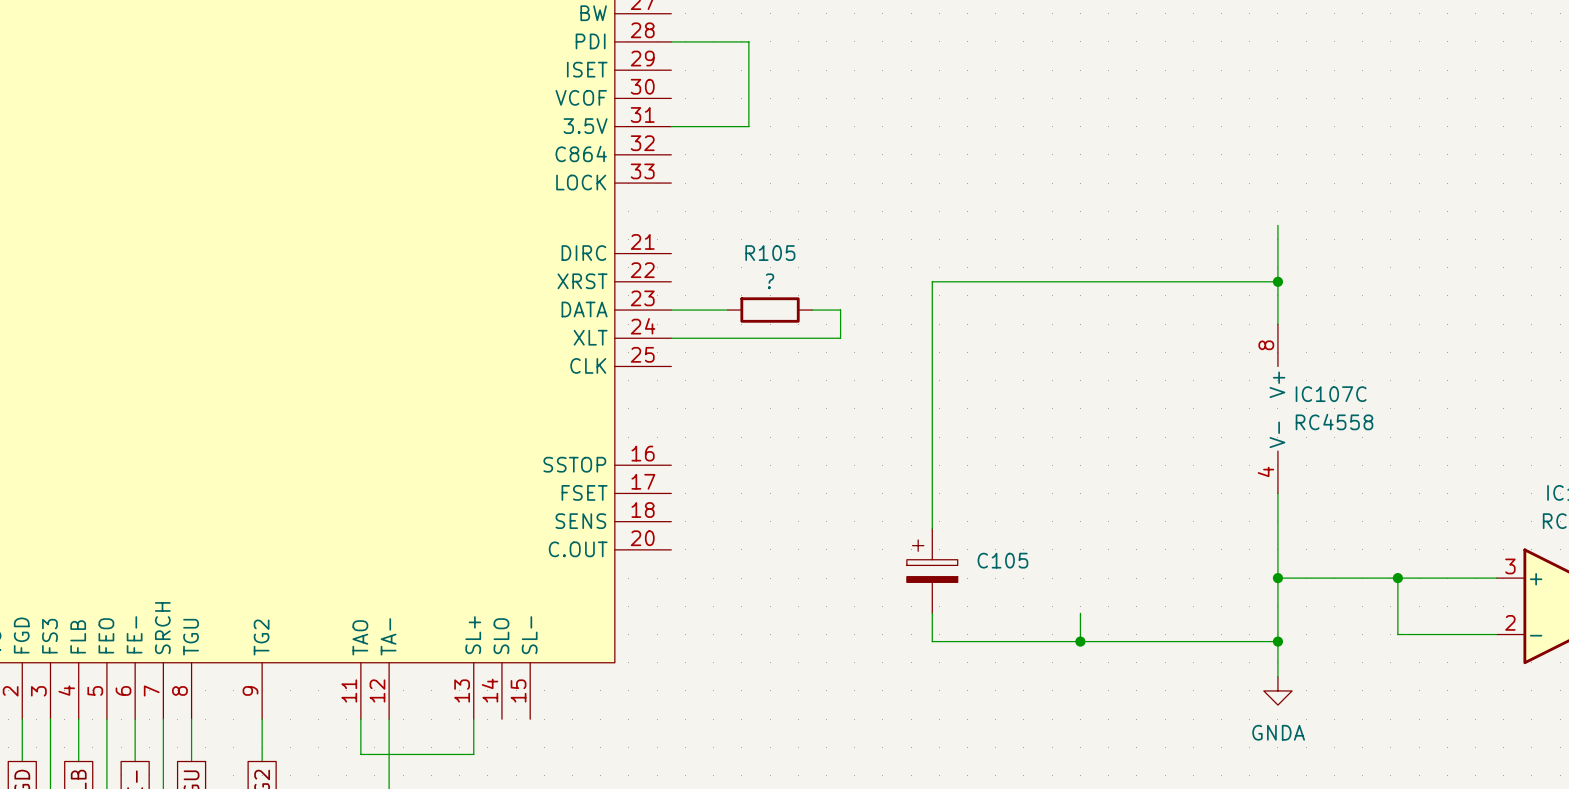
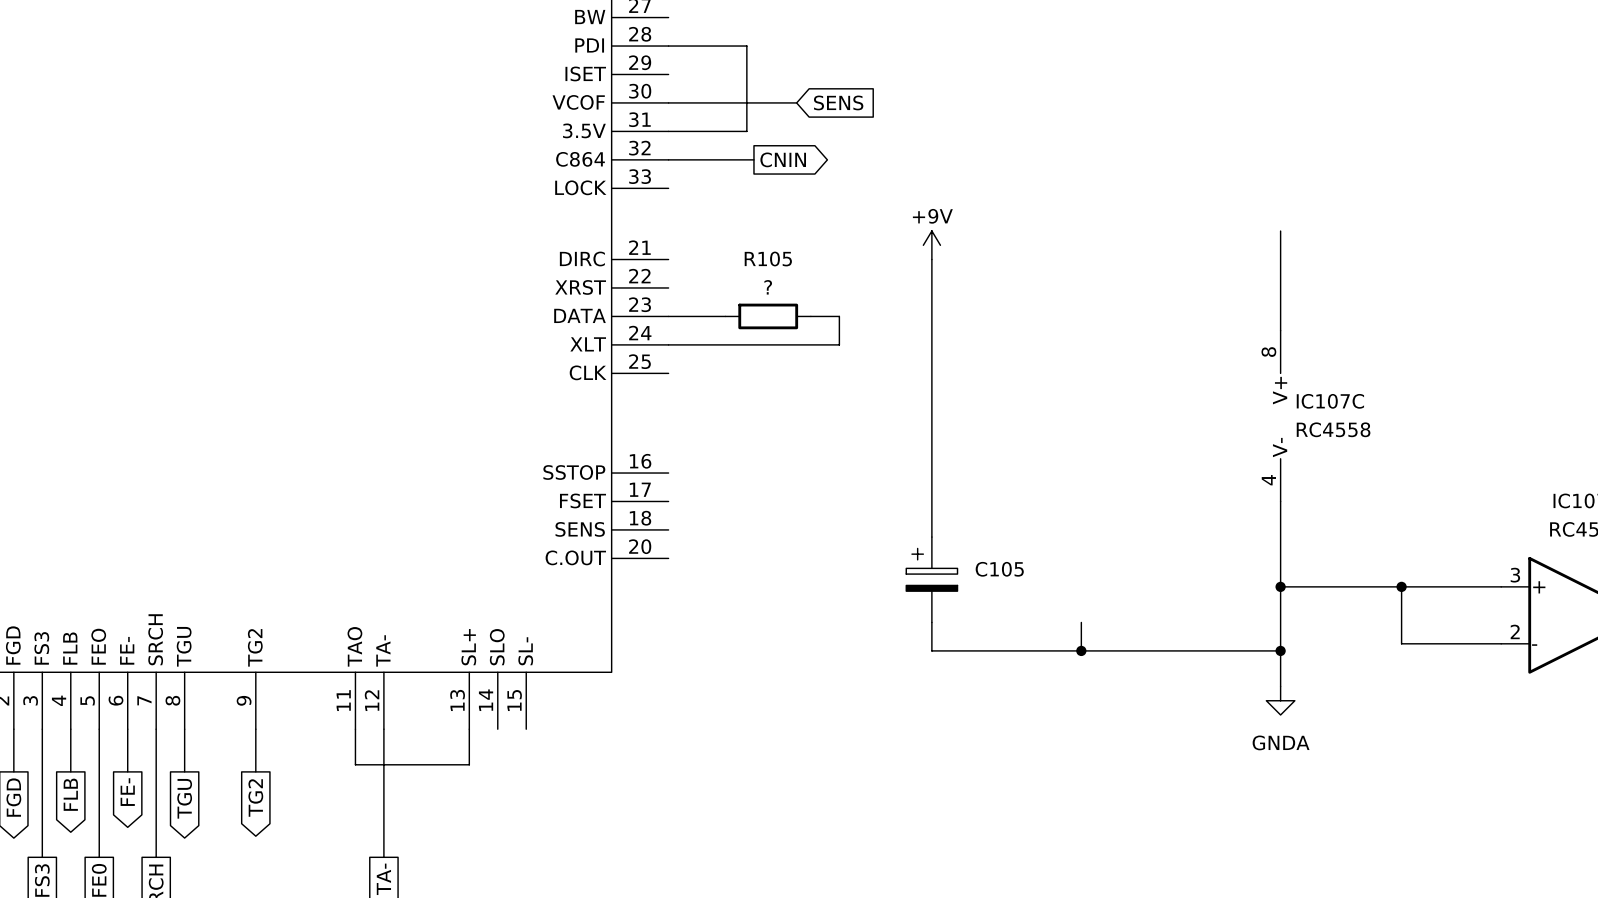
wire: none -> (668, 102) (796, 102)
global label: none -> SENS (838, 102)
wire: none -> (668, 159) (753, 159)
global label: none -> CNIN (783, 159)
power symbol: none -> +9V (931, 245)
wire: (932, 281) (1277, 281) -> (931, 287) (931, 259)
junction: (1277, 281) -> none

